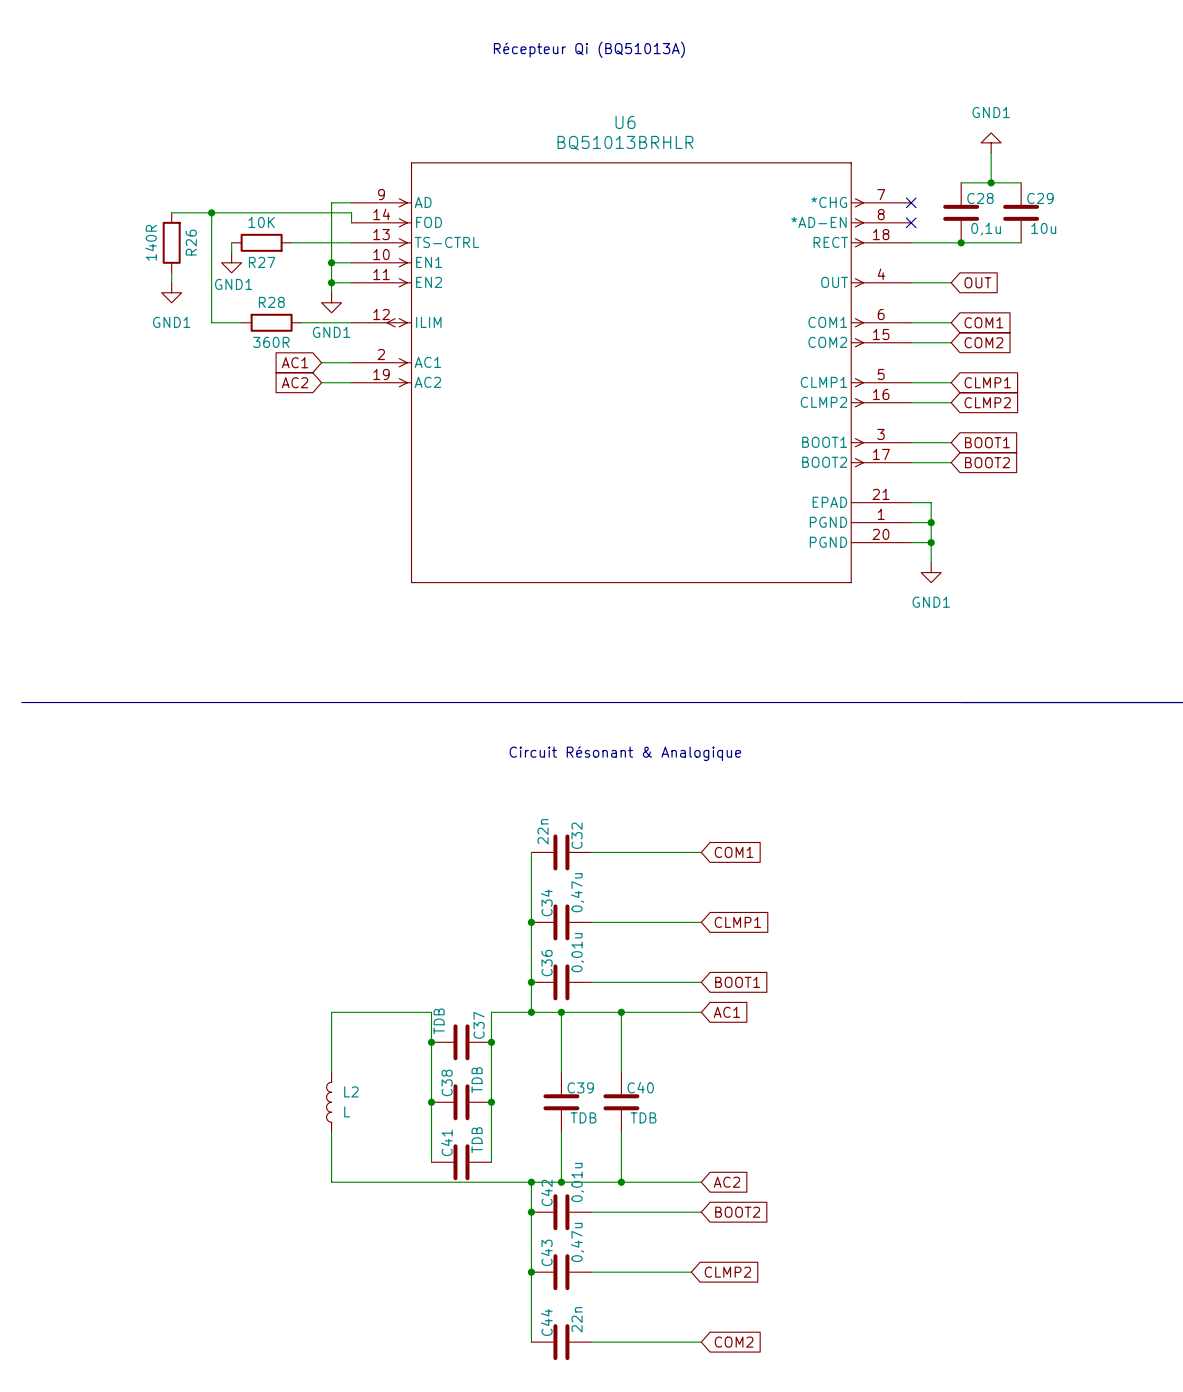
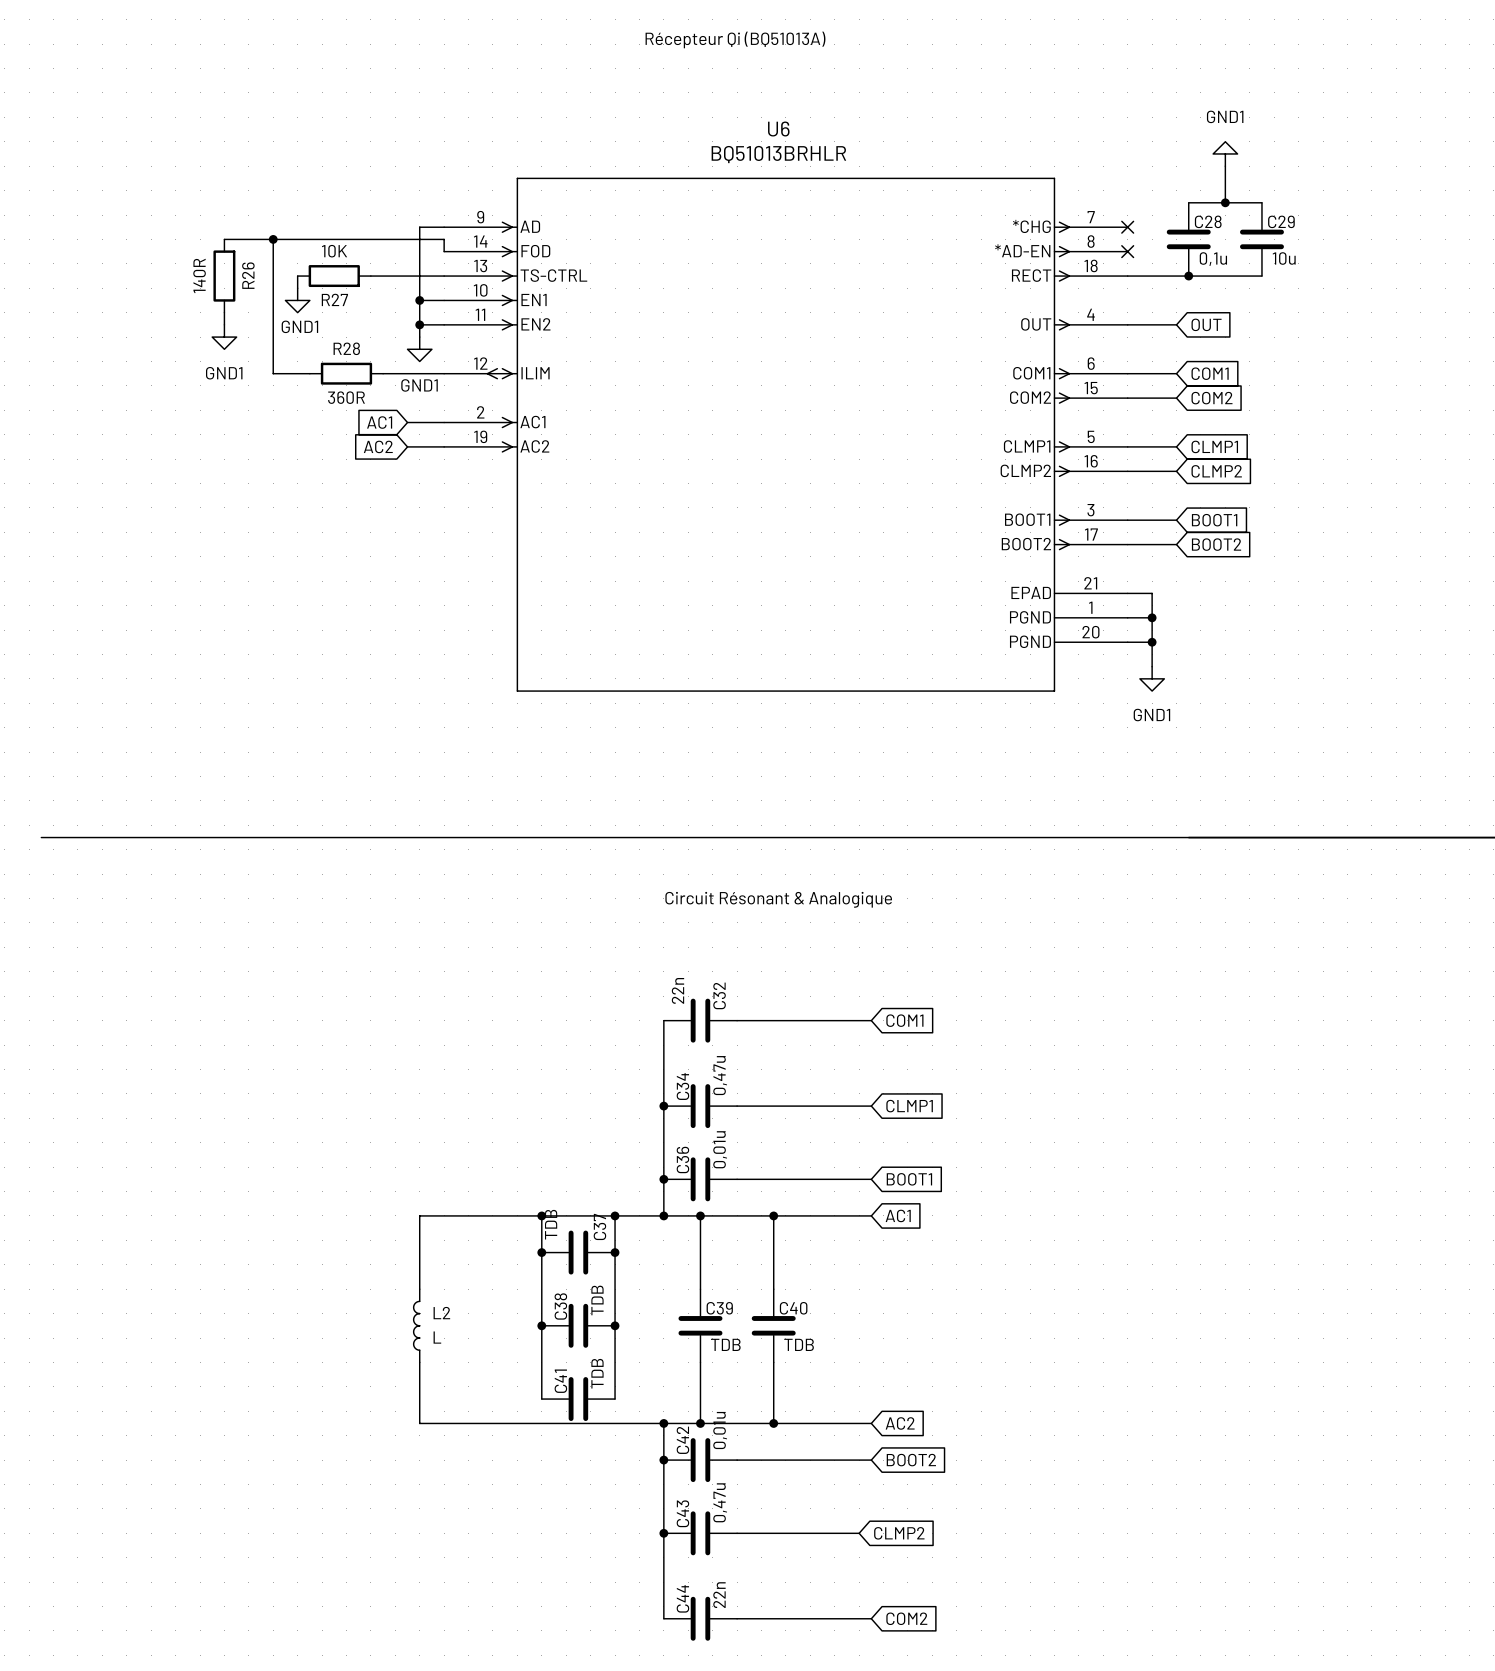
wire: none -> (541, 1215) (615, 1215)
junction: none -> (541, 1215)
junction: none -> (615, 1215)

